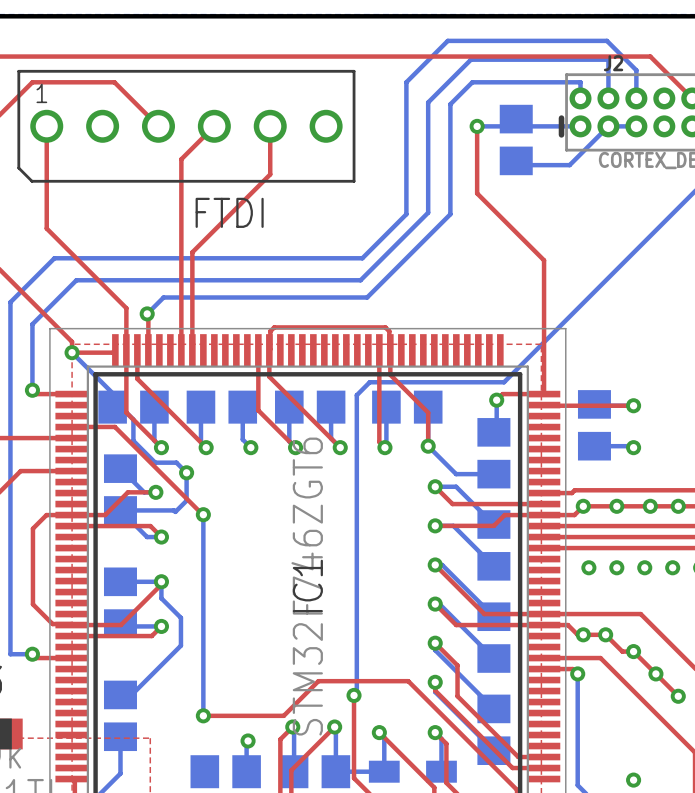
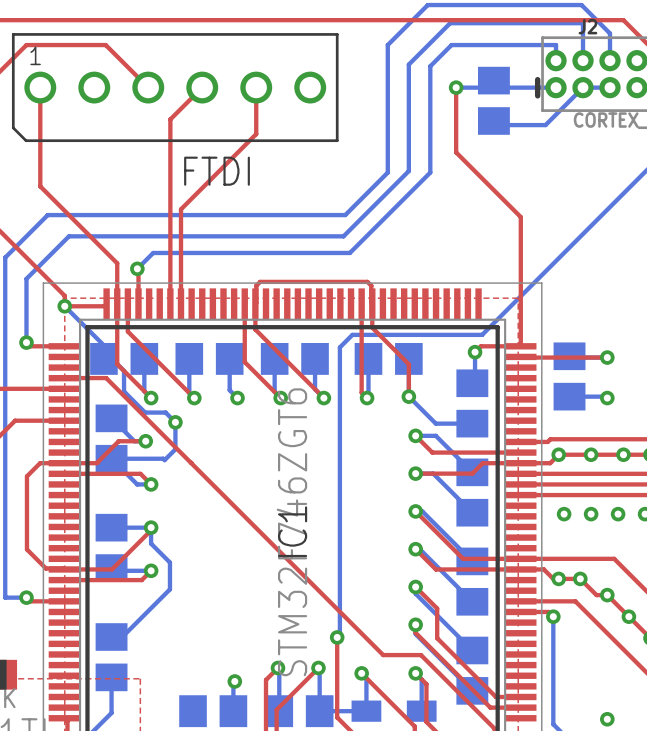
bottom track: (203, 514) (203, 715) -> none
via: (203, 514) -> none
top track: (440, 713) (408, 681) (318, 681) (283, 715) (203, 715) -> (421, 655) (383, 655) (190, 462)
via: (203, 715) -> none

